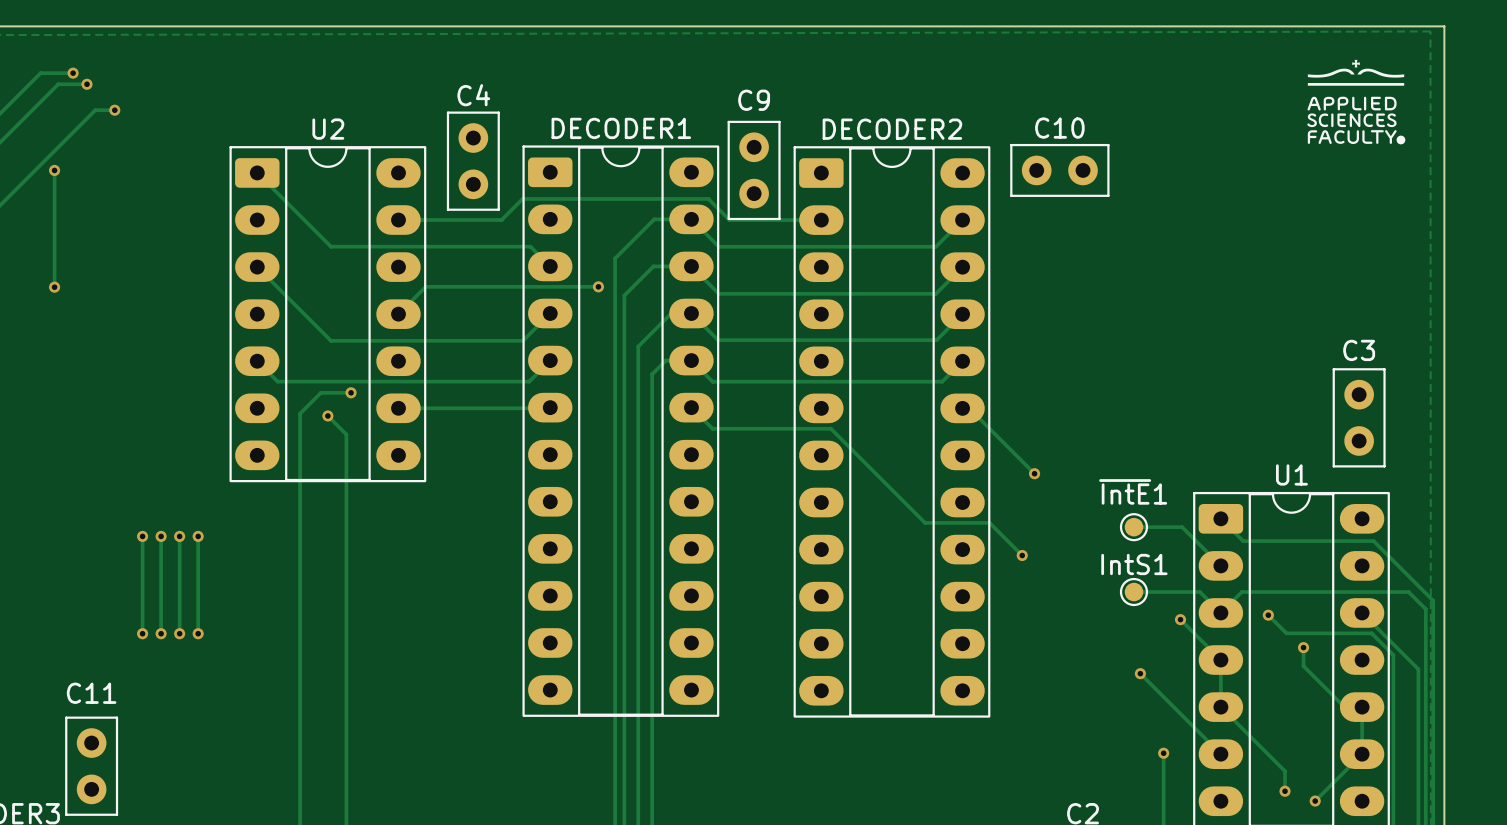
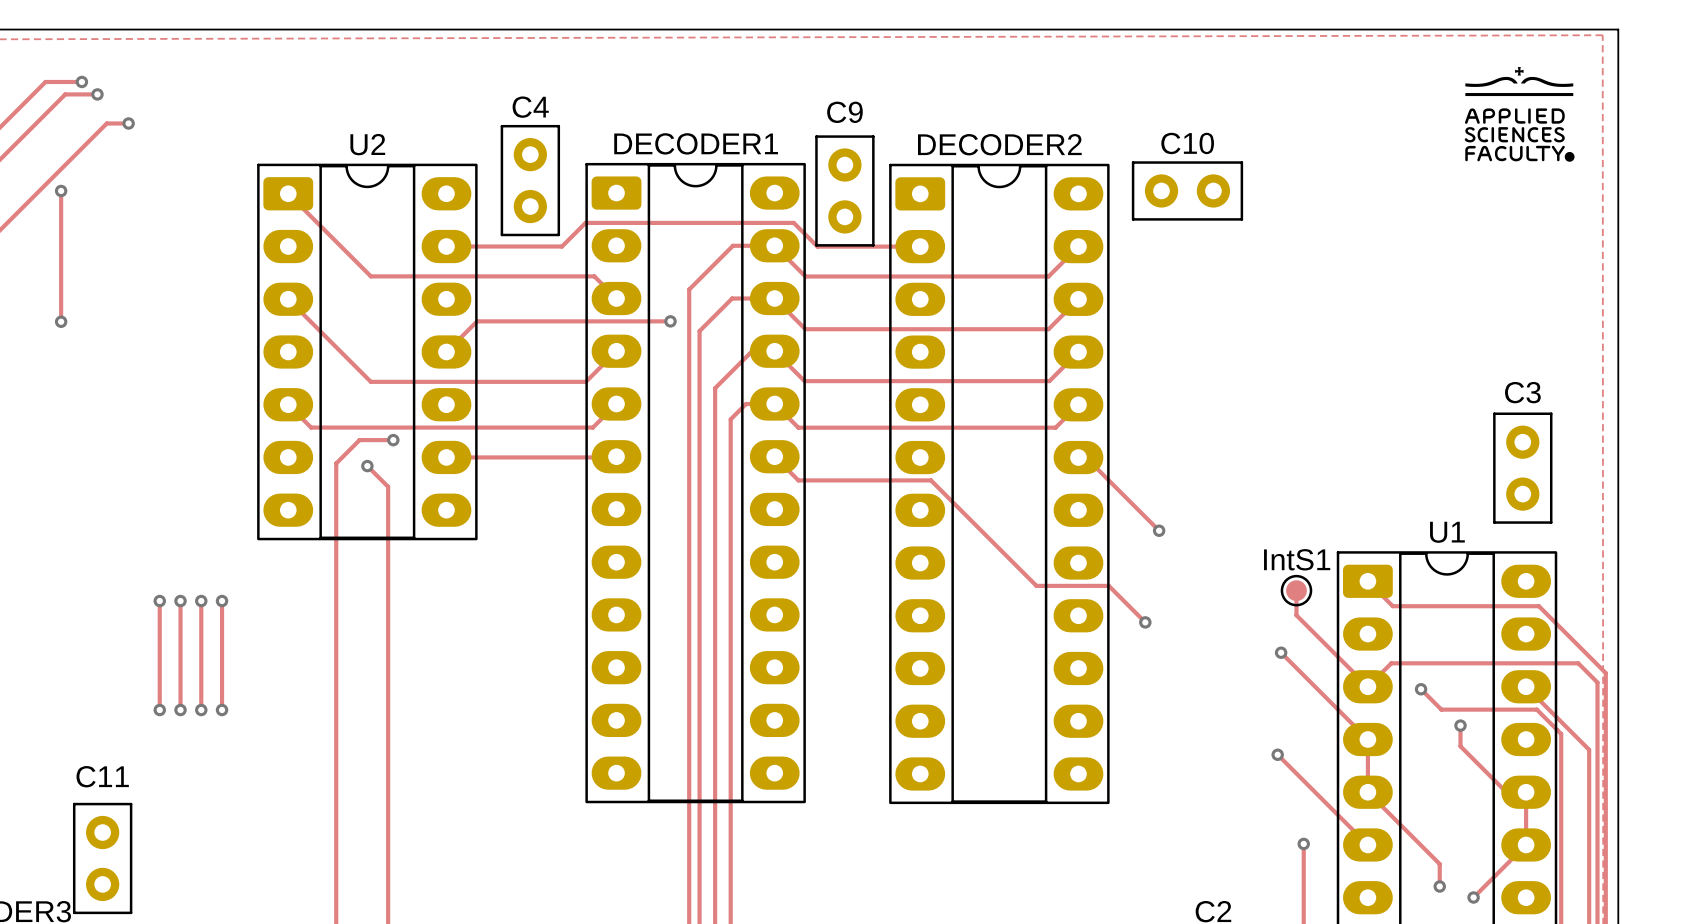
track: (1133, 527) (1182, 527) (1220, 565) -> none
~{IntE}1: (1133, 527) -> none
track: none -> (1281, 652) (1322, 694)
track: (1133, 592) (1199, 592) -> (1296, 590) (1296, 615) (1344, 663)
IntS1 position: (1133, 592) -> (1296, 590)
via position: (1180, 619) -> (1281, 652)

